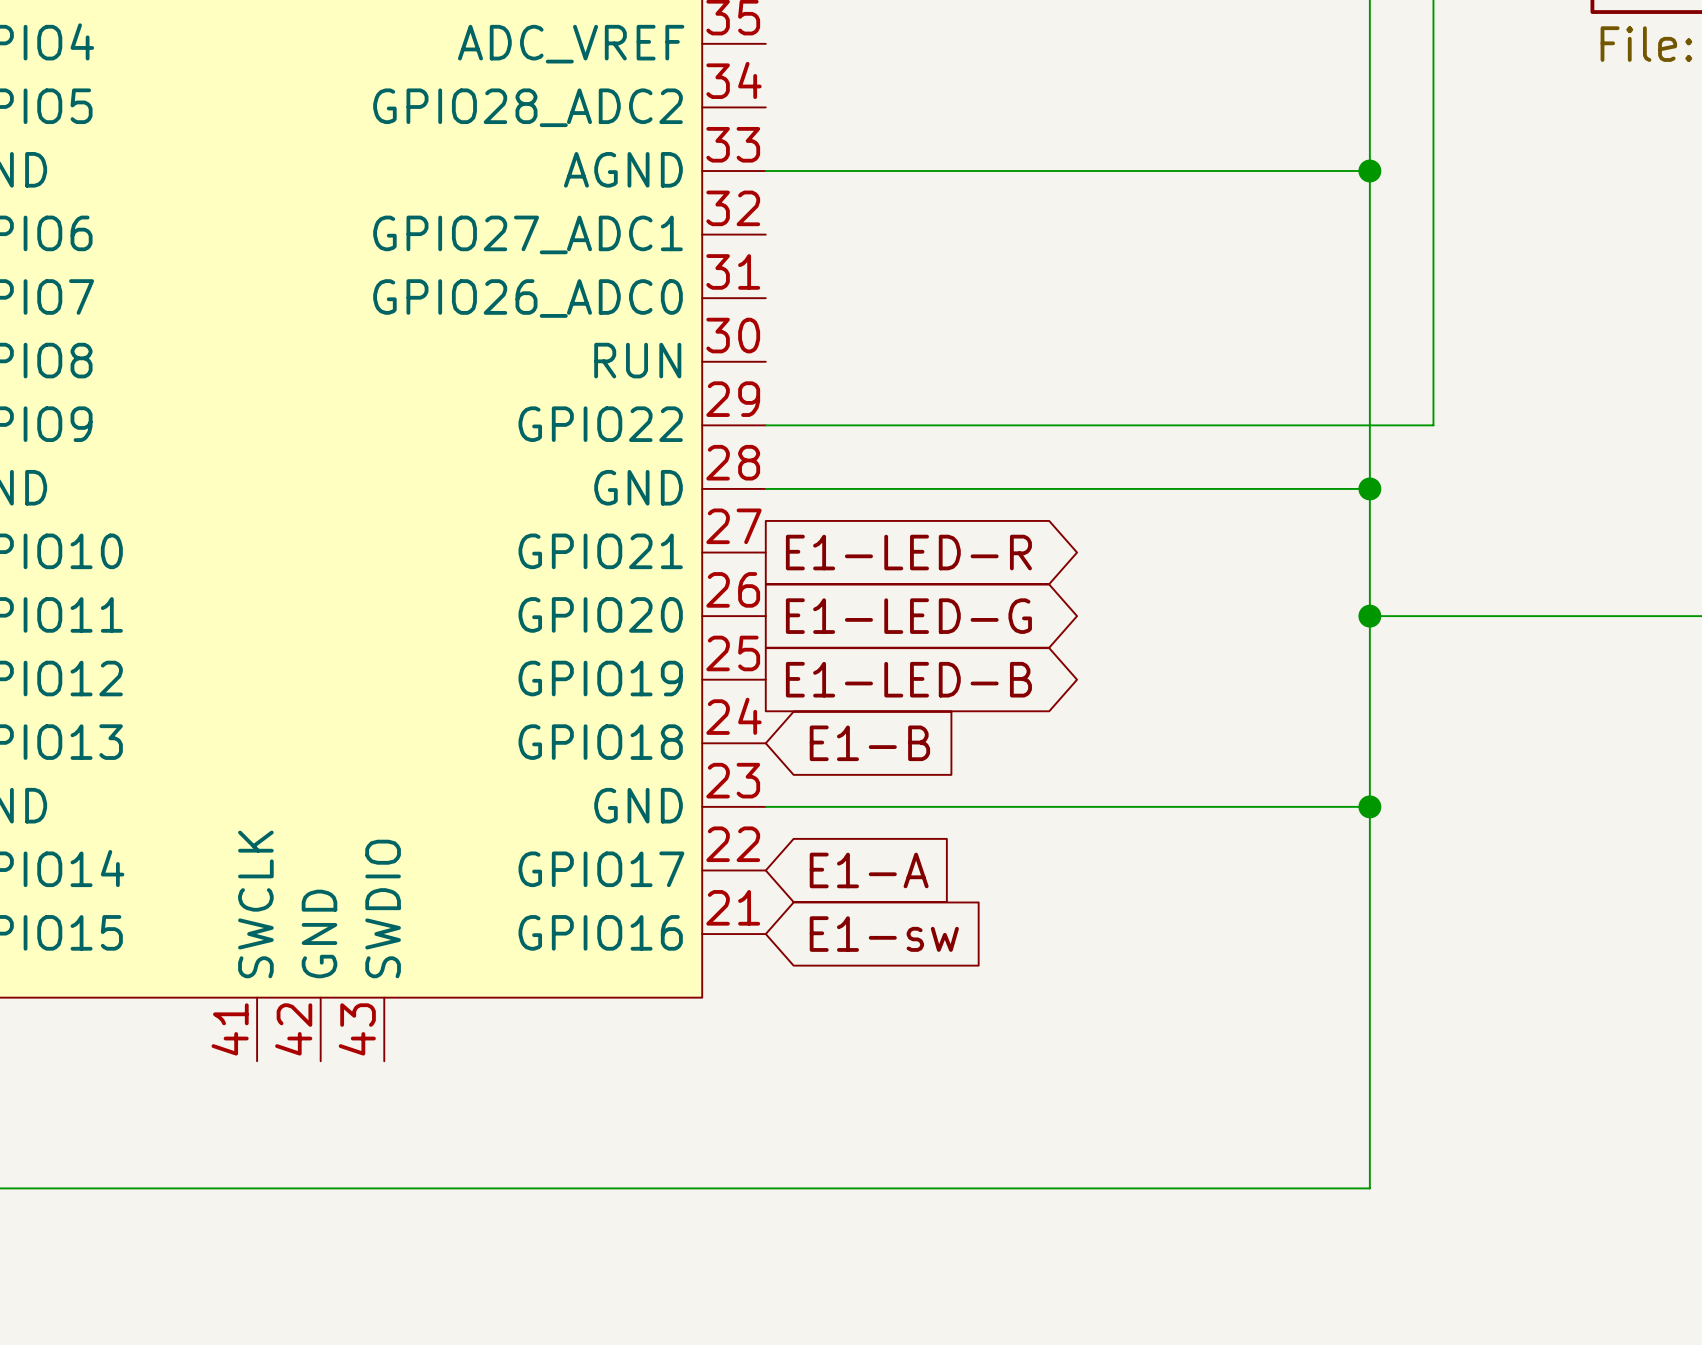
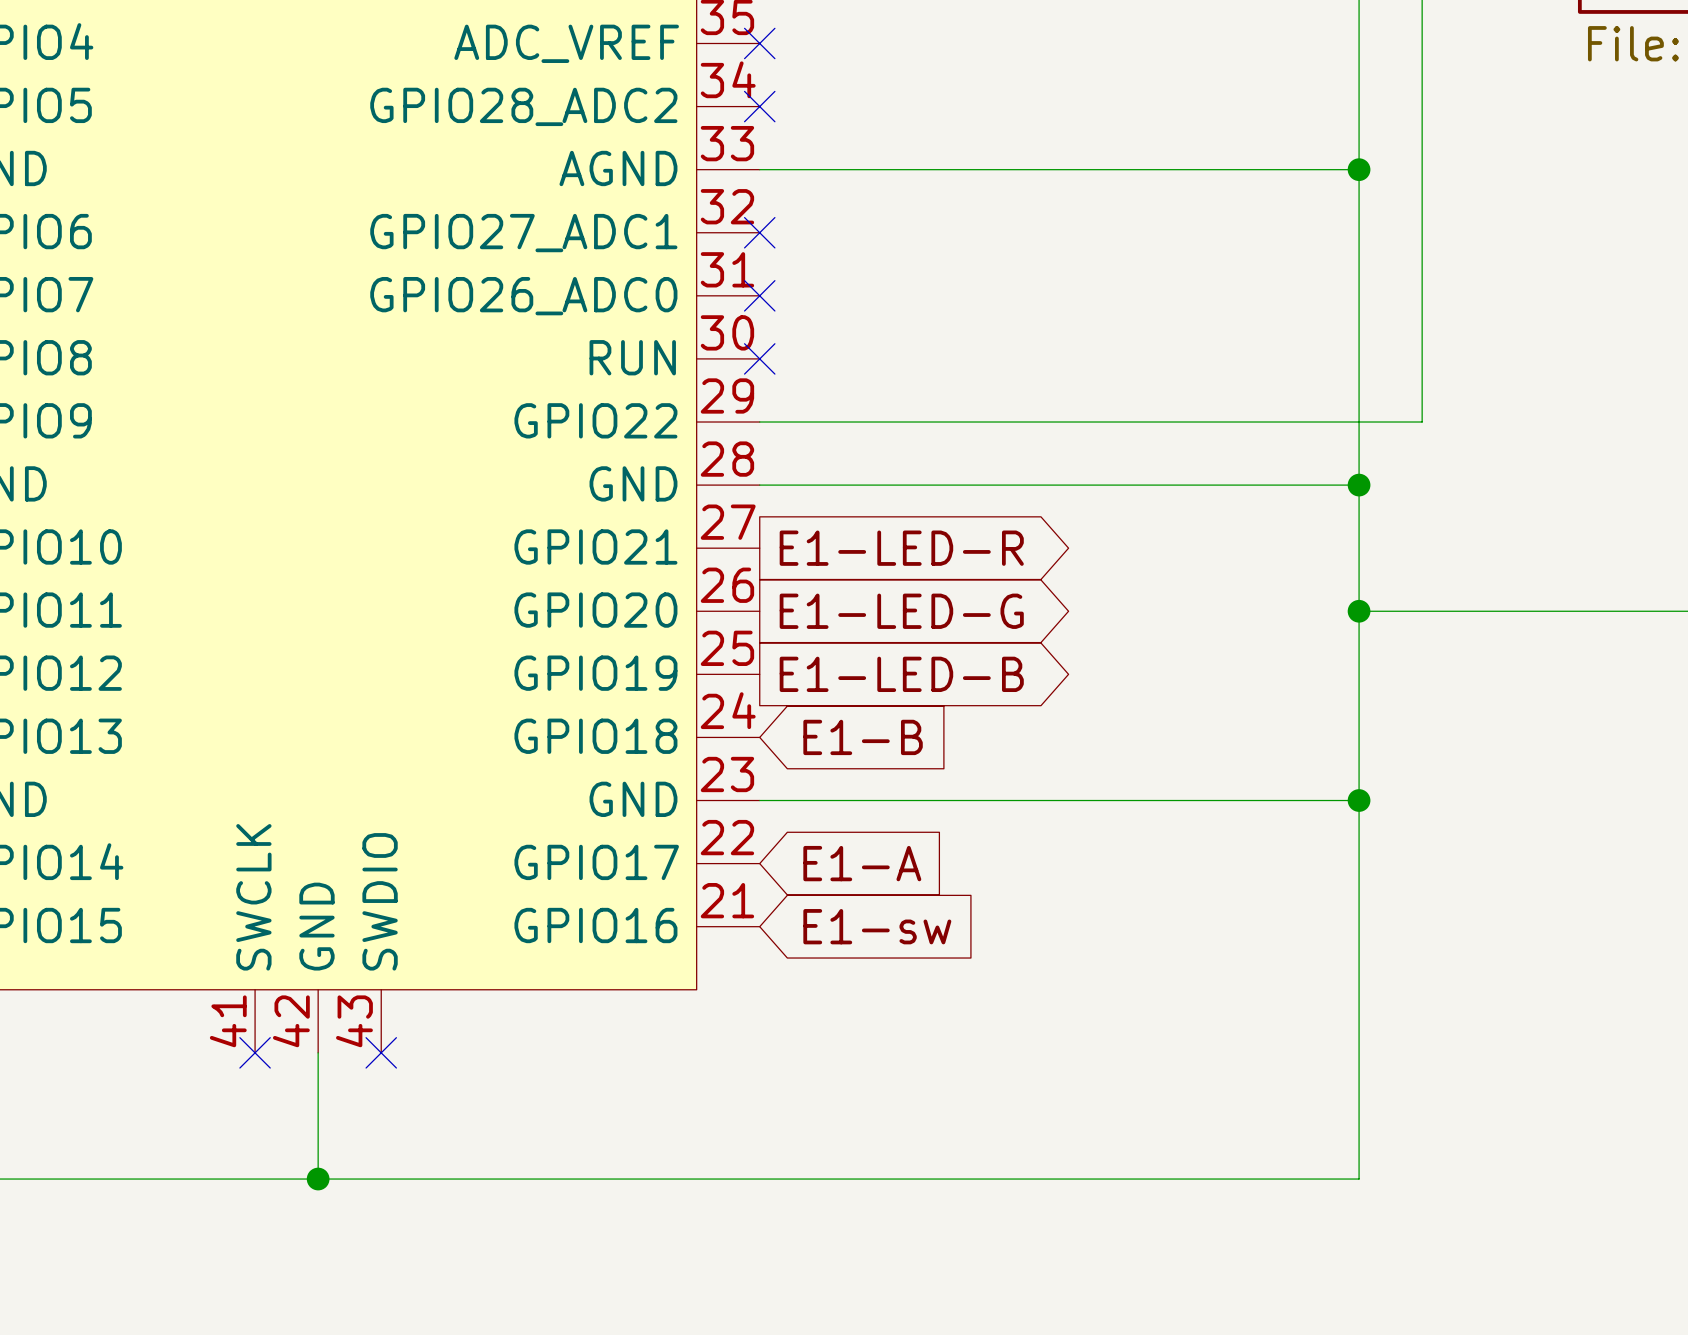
no-connect mark: none -> (759, 43)
no-connect mark: none -> (759, 106)
no-connect mark: none -> (759, 232)
no-connect mark: none -> (759, 295)
no-connect mark: none -> (759, 358)
no-connect mark: none -> (255, 1052)
wire: none -> (318, 1052) (318, 1179)
no-connect mark: none -> (381, 1052)
junction: none -> (318, 1179)

